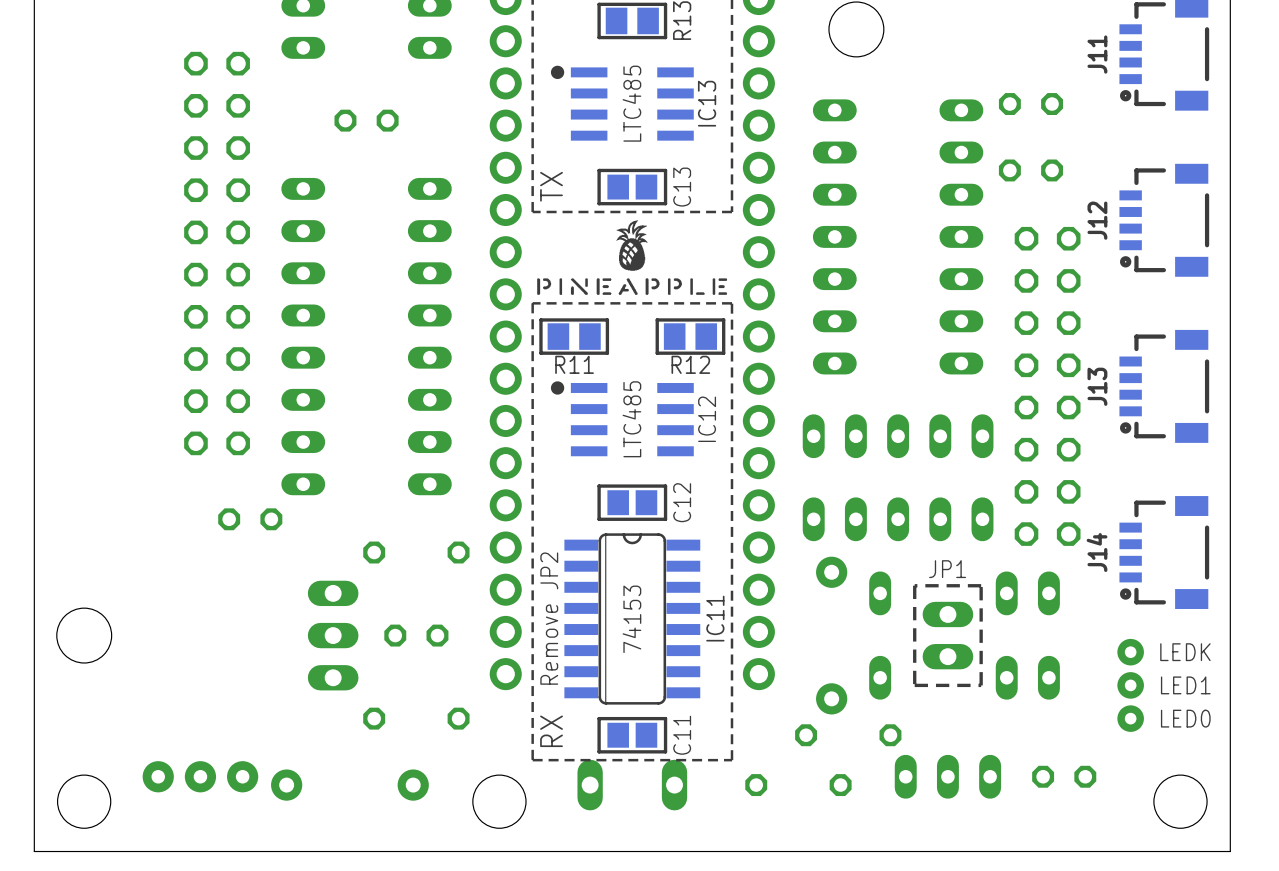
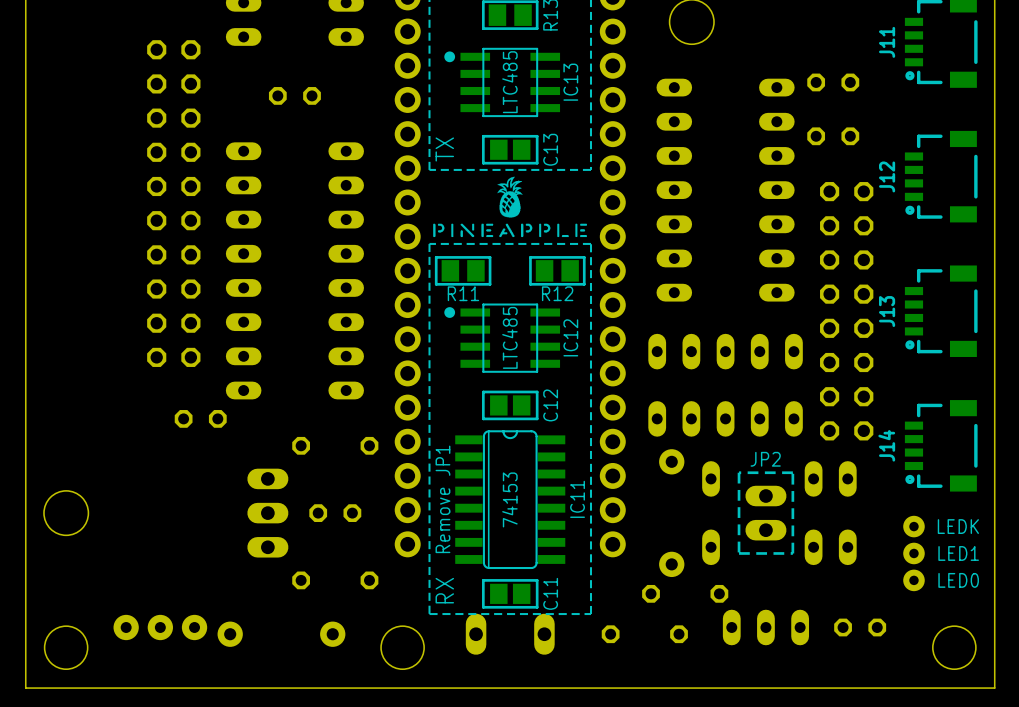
line: none -> (537, 48) (483, 48) (483, 116) (537, 116) (537, 48)
line: none -> (537, 304) (537, 371) (483, 371) (483, 304) (537, 304)
text: JP1 (947, 569) -> JP2 (765, 459)
text: Remove JP2 (549, 618) -> Remove JP1 (442, 499)

